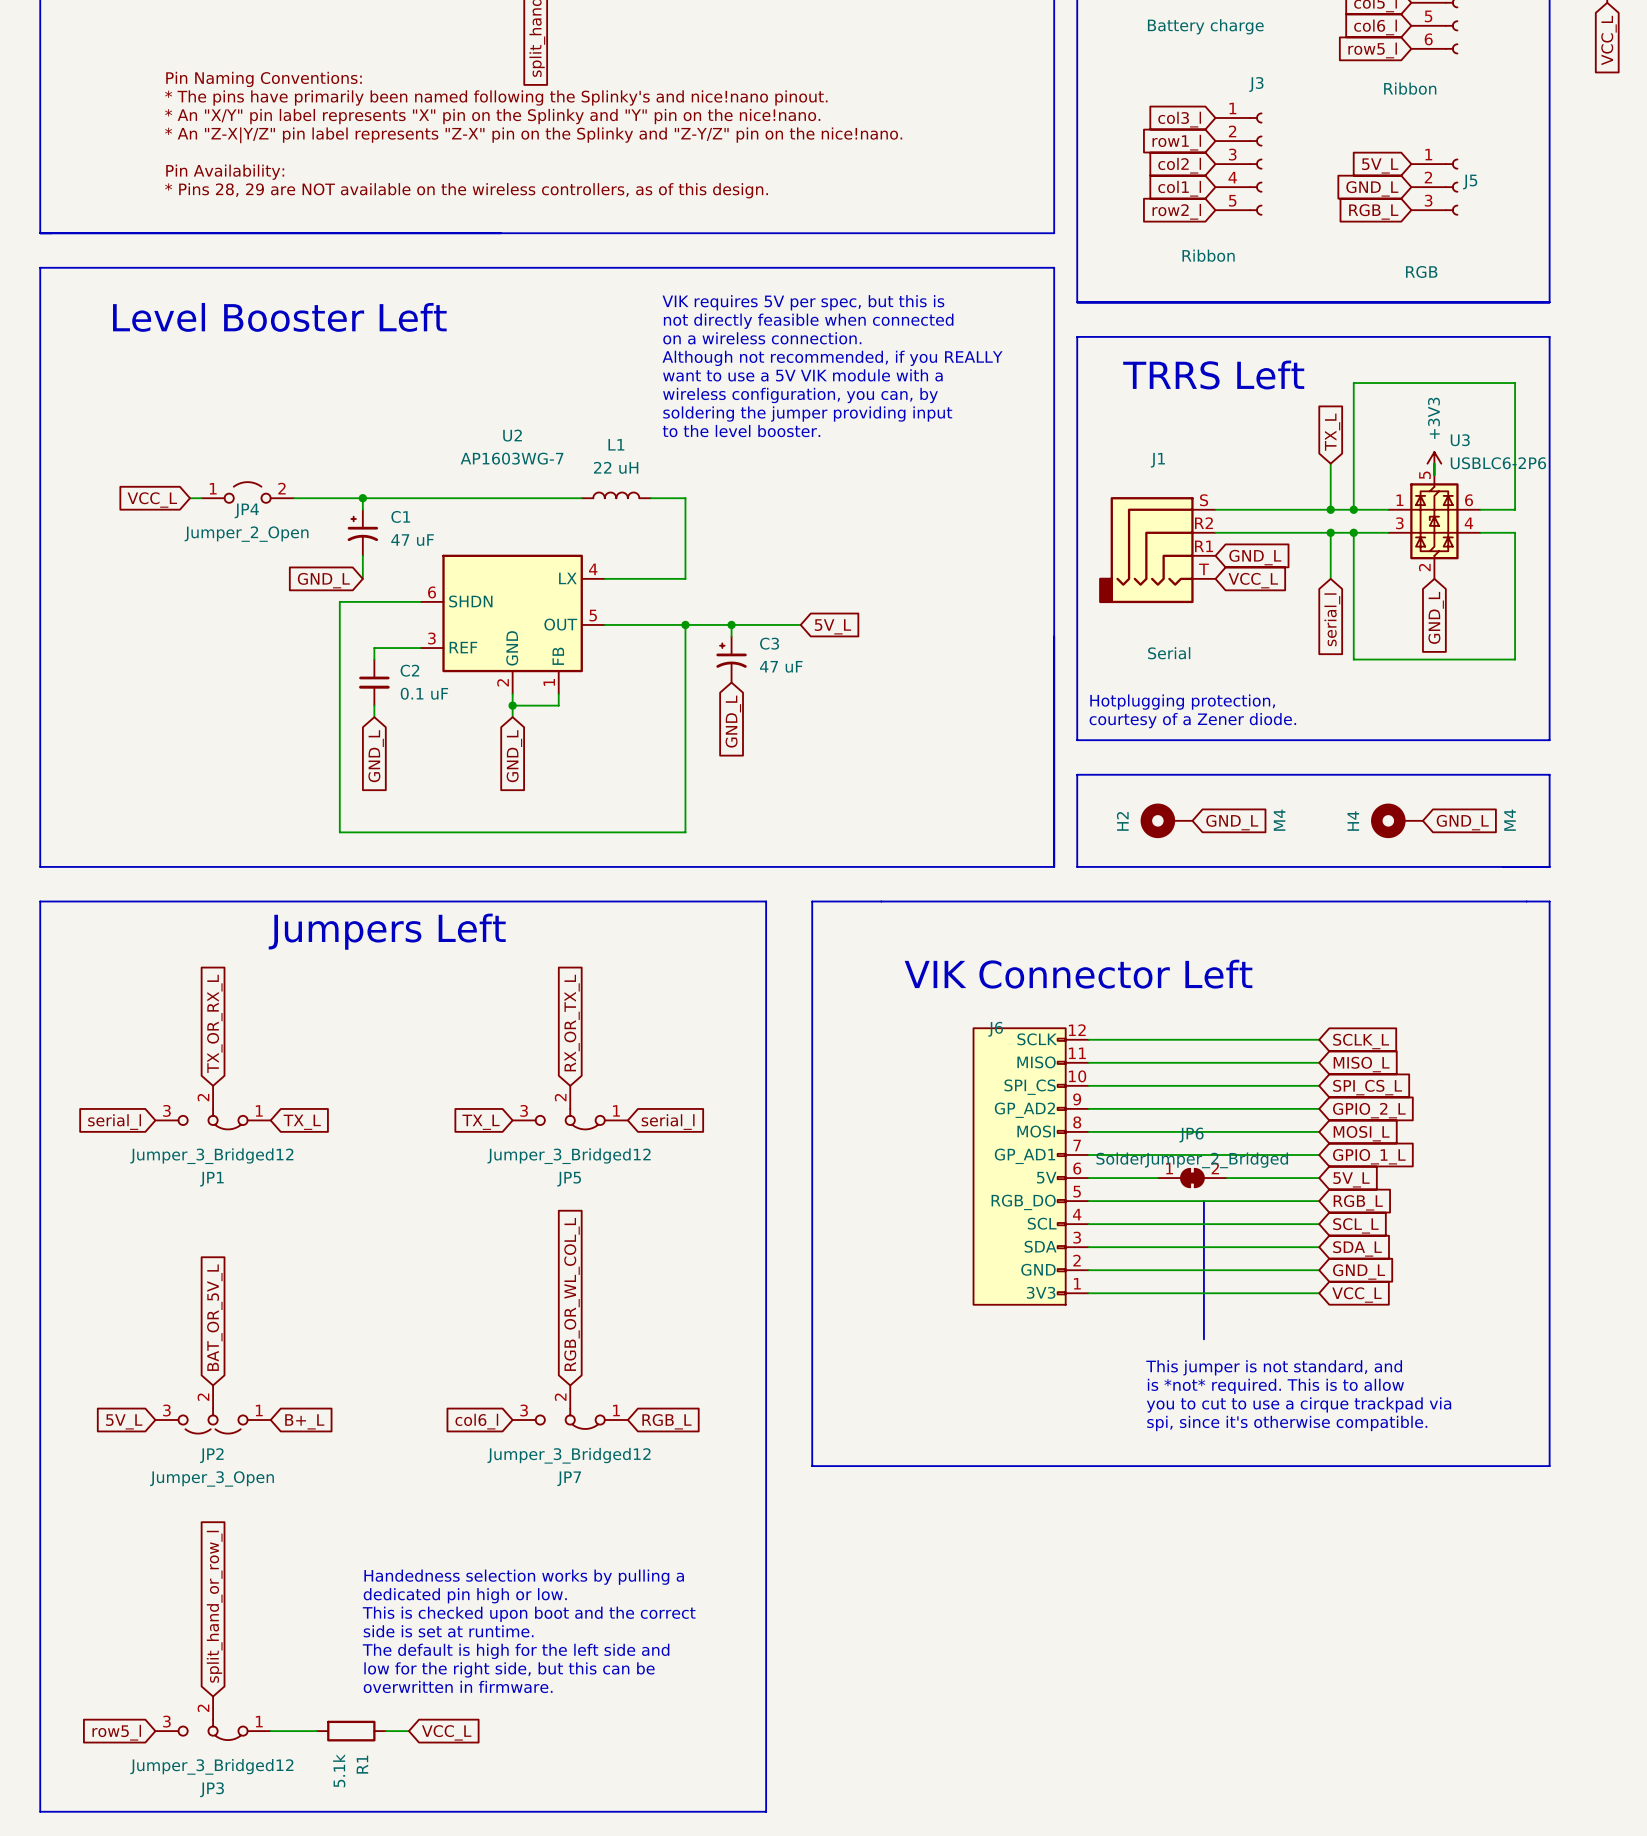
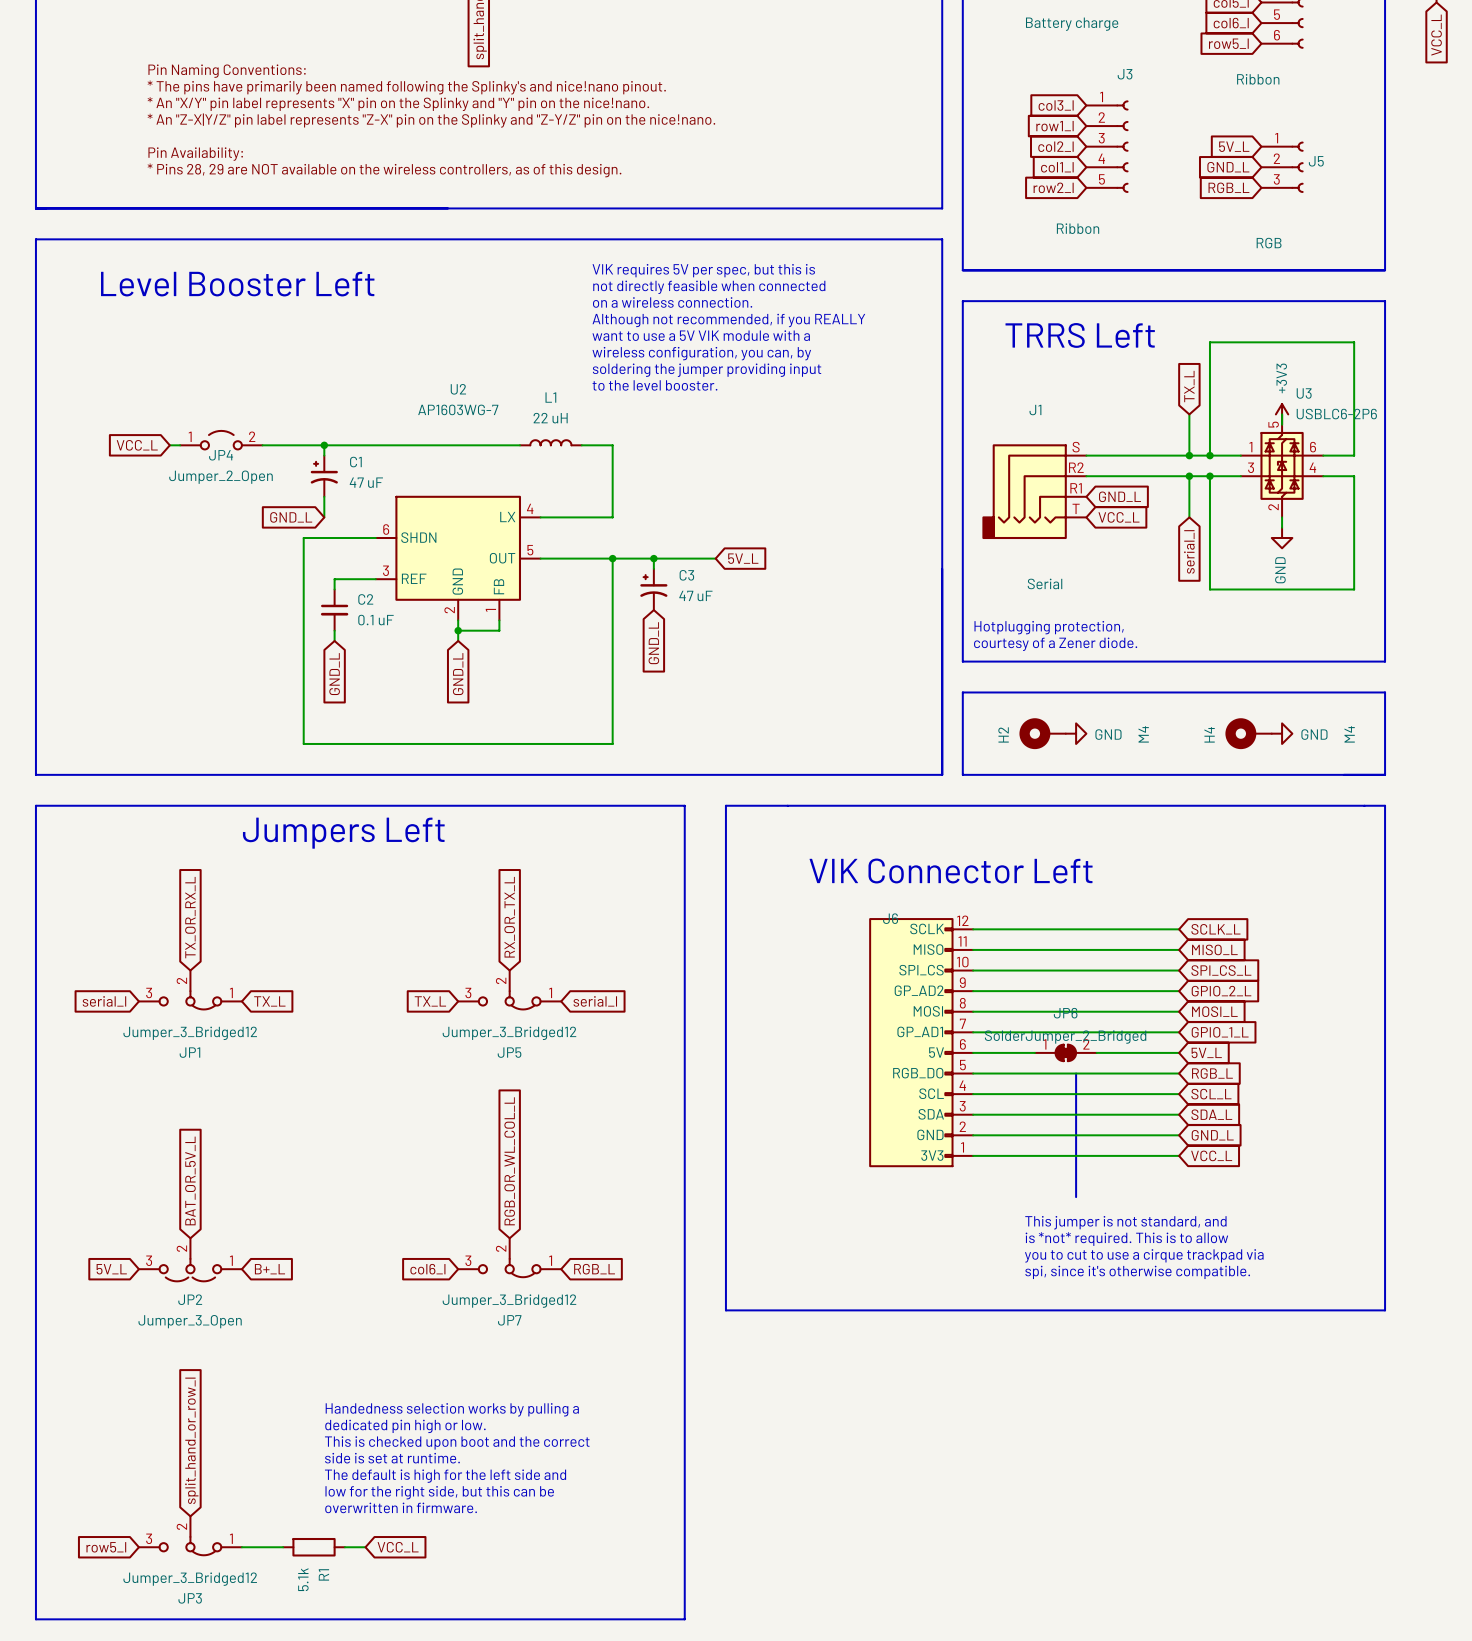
wire: none -> (1282, 517) (1282, 527)
power symbol: none -> GND (1282, 538)
global label: GND_L (1436, 617) -> none
power symbol: none -> GND (1076, 733)
power symbol: none -> GND (1282, 733)
global label: GND_L (1232, 822) -> none
global label: GND_L (1462, 822) -> none

